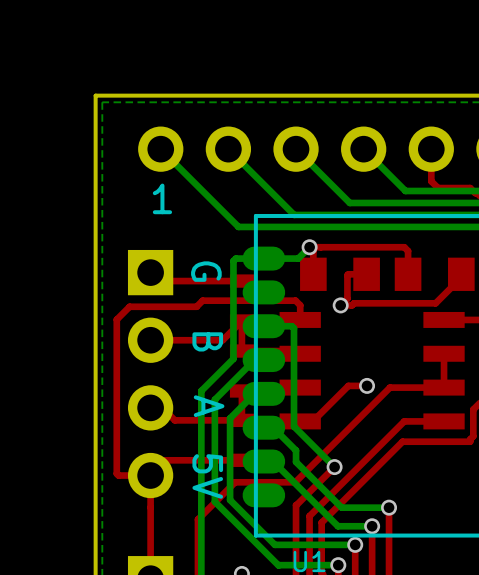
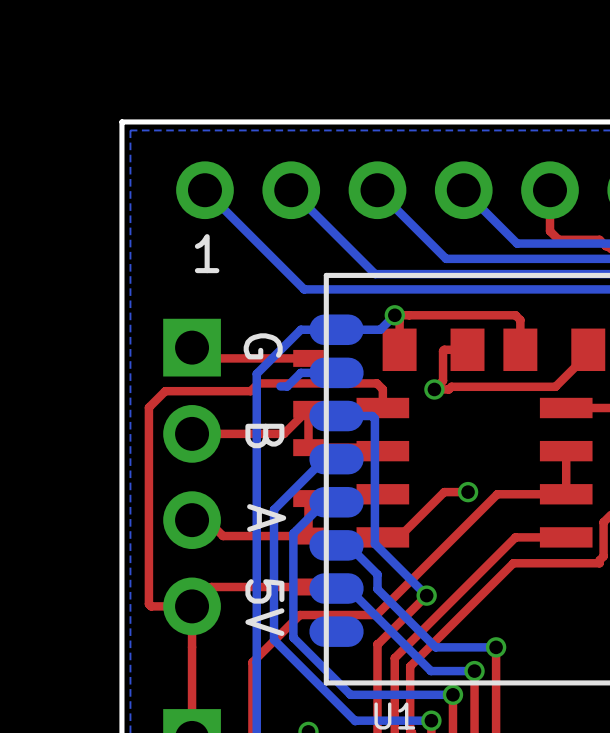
bottom track: (233, 261) (233, 358) (201, 390) -> (297, 332) (256, 373) (256, 498)
bottom track: none -> (336, 372) (300, 372) (287, 386) (280, 386)

